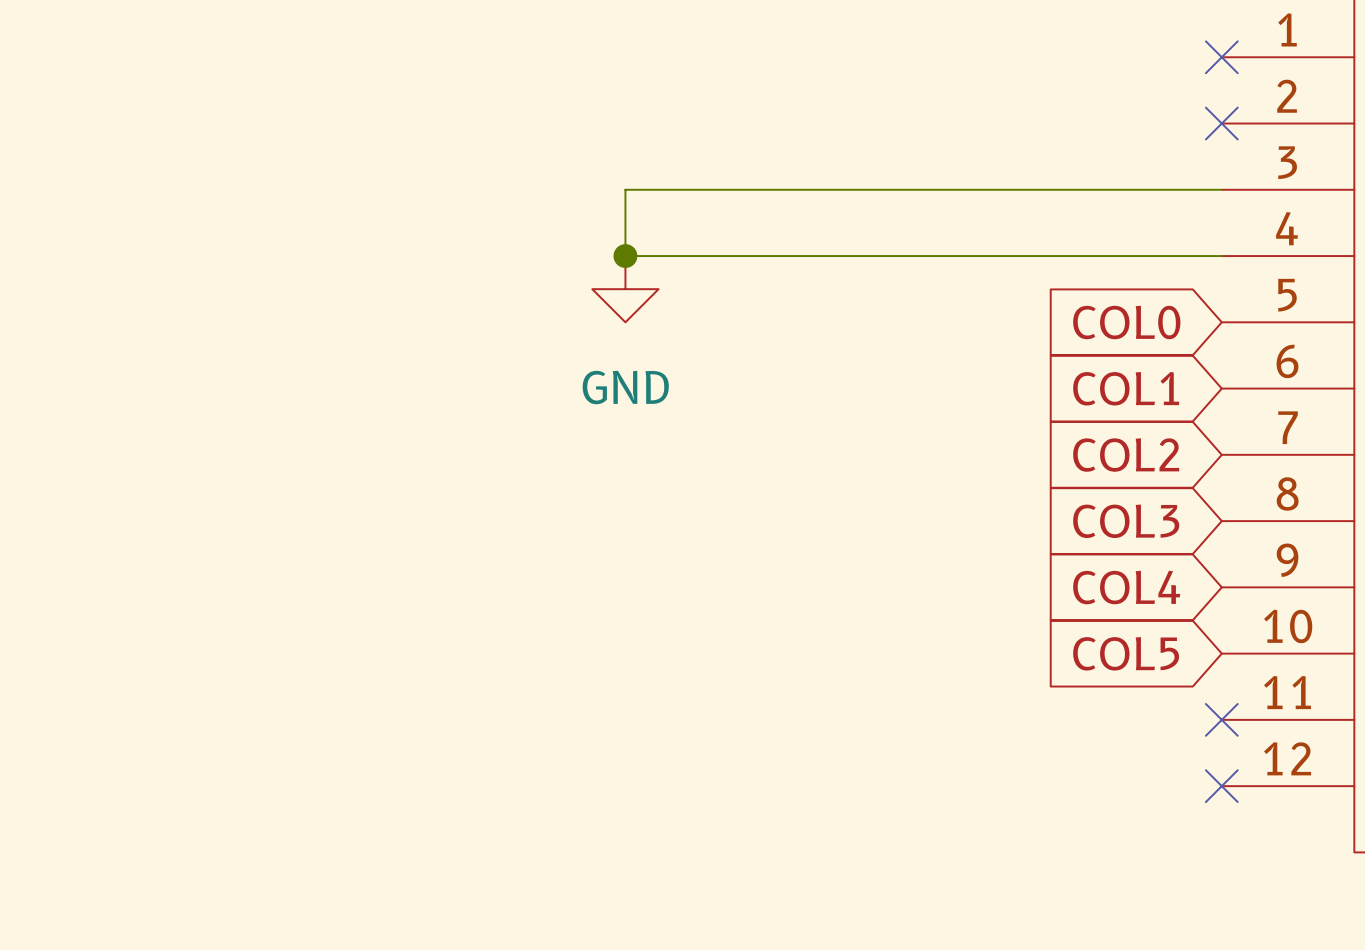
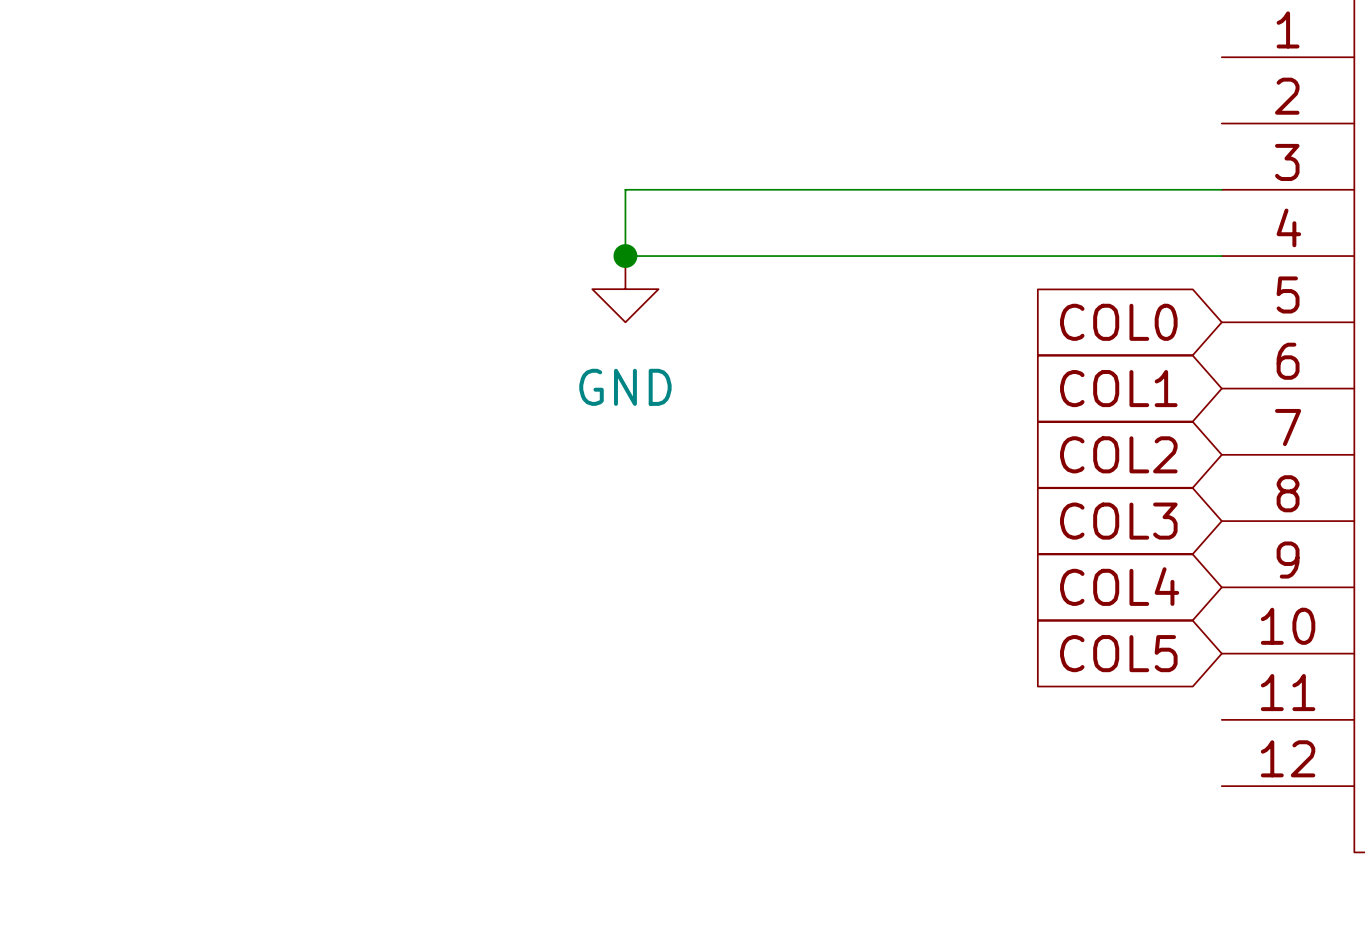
no-connect mark: (1221, 57) -> none
no-connect mark: (1221, 123) -> none
no-connect mark: (1221, 719) -> none
no-connect mark: (1221, 786) -> none

